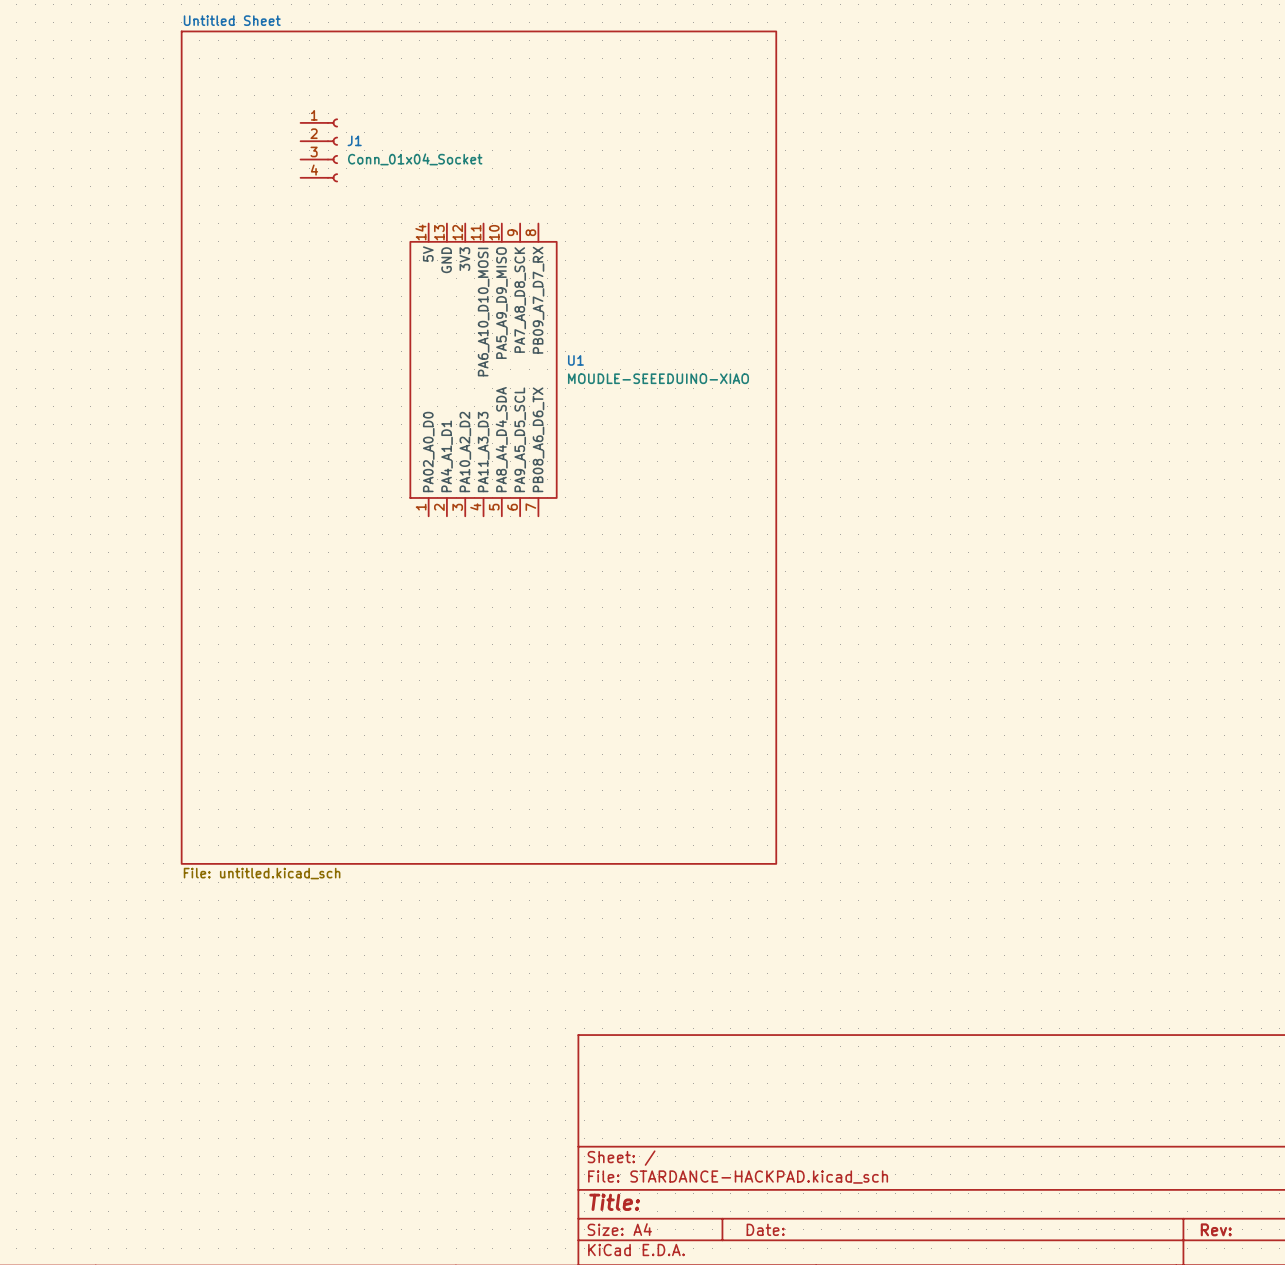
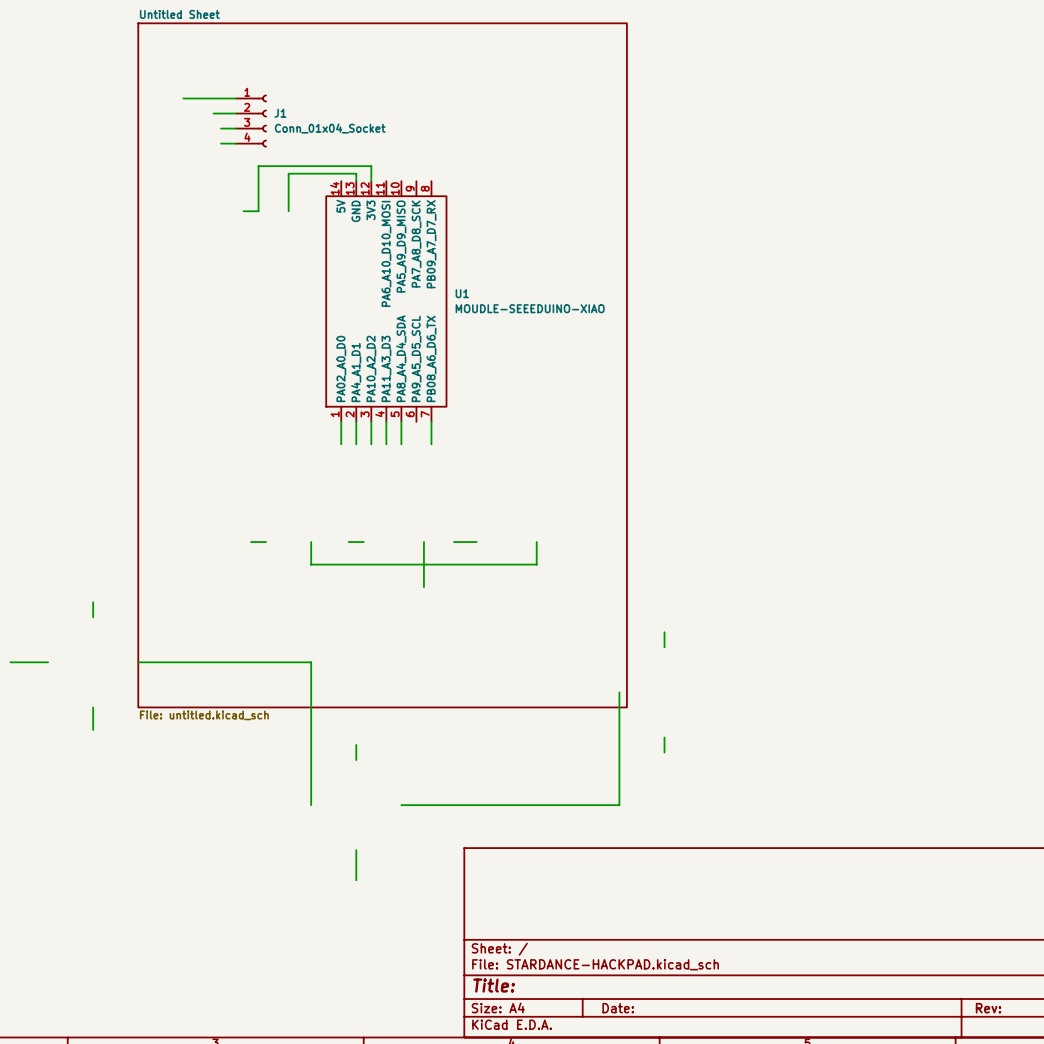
wire: none -> (183, 98) (236, 98)
wire: none -> (213, 113) (236, 113)
wire: none -> (220, 128) (236, 128)
wire: none -> (220, 143) (236, 143)
wire: none -> (356, 181) (356, 173) (288, 173) (288, 211)
wire: none -> (371, 181) (371, 166) (258, 166) (258, 211) (243, 211)
wire: none -> (341, 421) (341, 444)
wire: none -> (356, 421) (356, 444)
wire: none -> (371, 421) (371, 444)
wire: none -> (386, 421) (386, 444)
wire: none -> (401, 421) (401, 444)
wire: none -> (431, 421) (431, 444)
wire: none -> (251, 542) (266, 542)
wire: none -> (311, 542) (311, 564) (536, 564) (536, 542)
wire: none -> (348, 542) (363, 542)
wire: none -> (423, 542) (423, 587)
wire: none -> (454, 542) (476, 542)
wire: none -> (93, 602) (93, 617)
wire: none -> (664, 632) (664, 647)
wire: none -> (10, 662) (48, 662)
wire: none -> (138, 662) (311, 662) (311, 805)
wire: none -> (619, 692) (619, 805) (401, 805)
wire: none -> (93, 707) (93, 729)
wire: none -> (664, 737) (664, 752)
wire: none -> (356, 745) (356, 760)
wire: none -> (356, 850) (356, 880)

